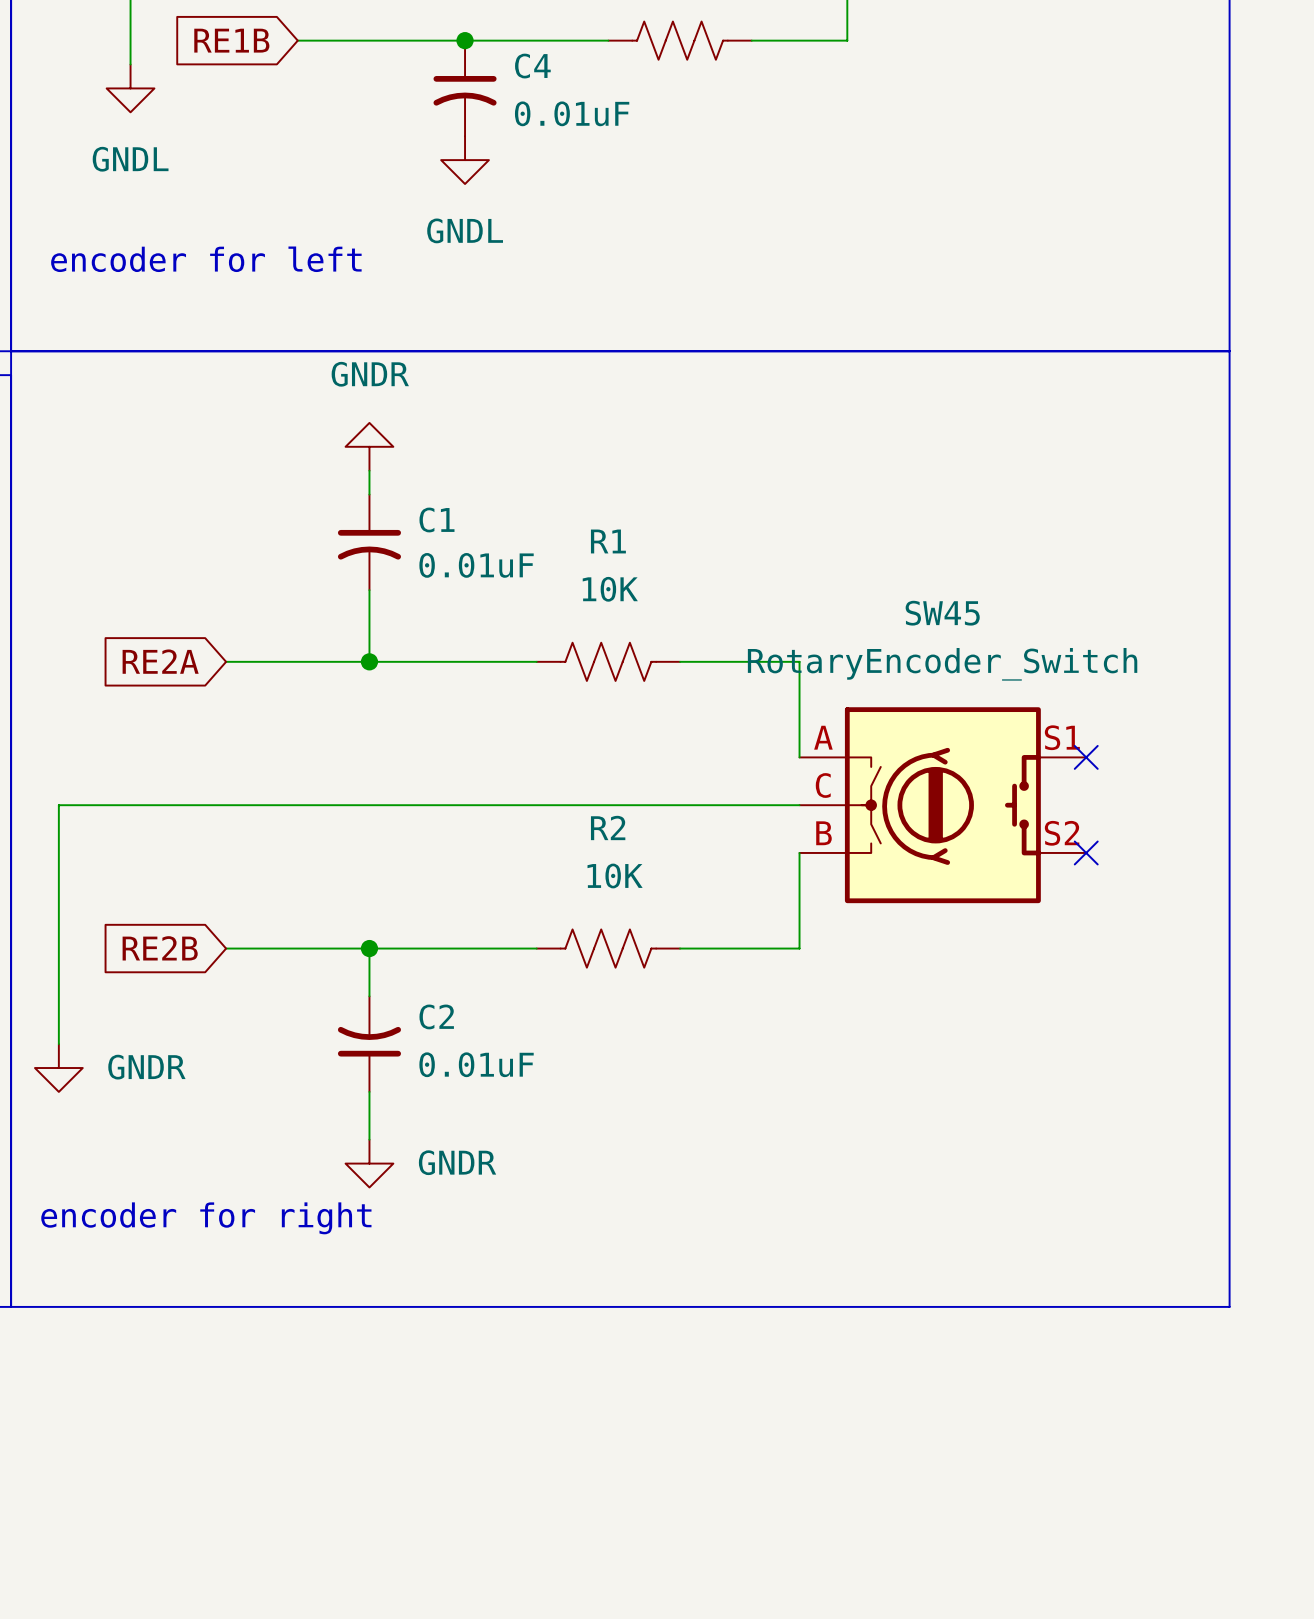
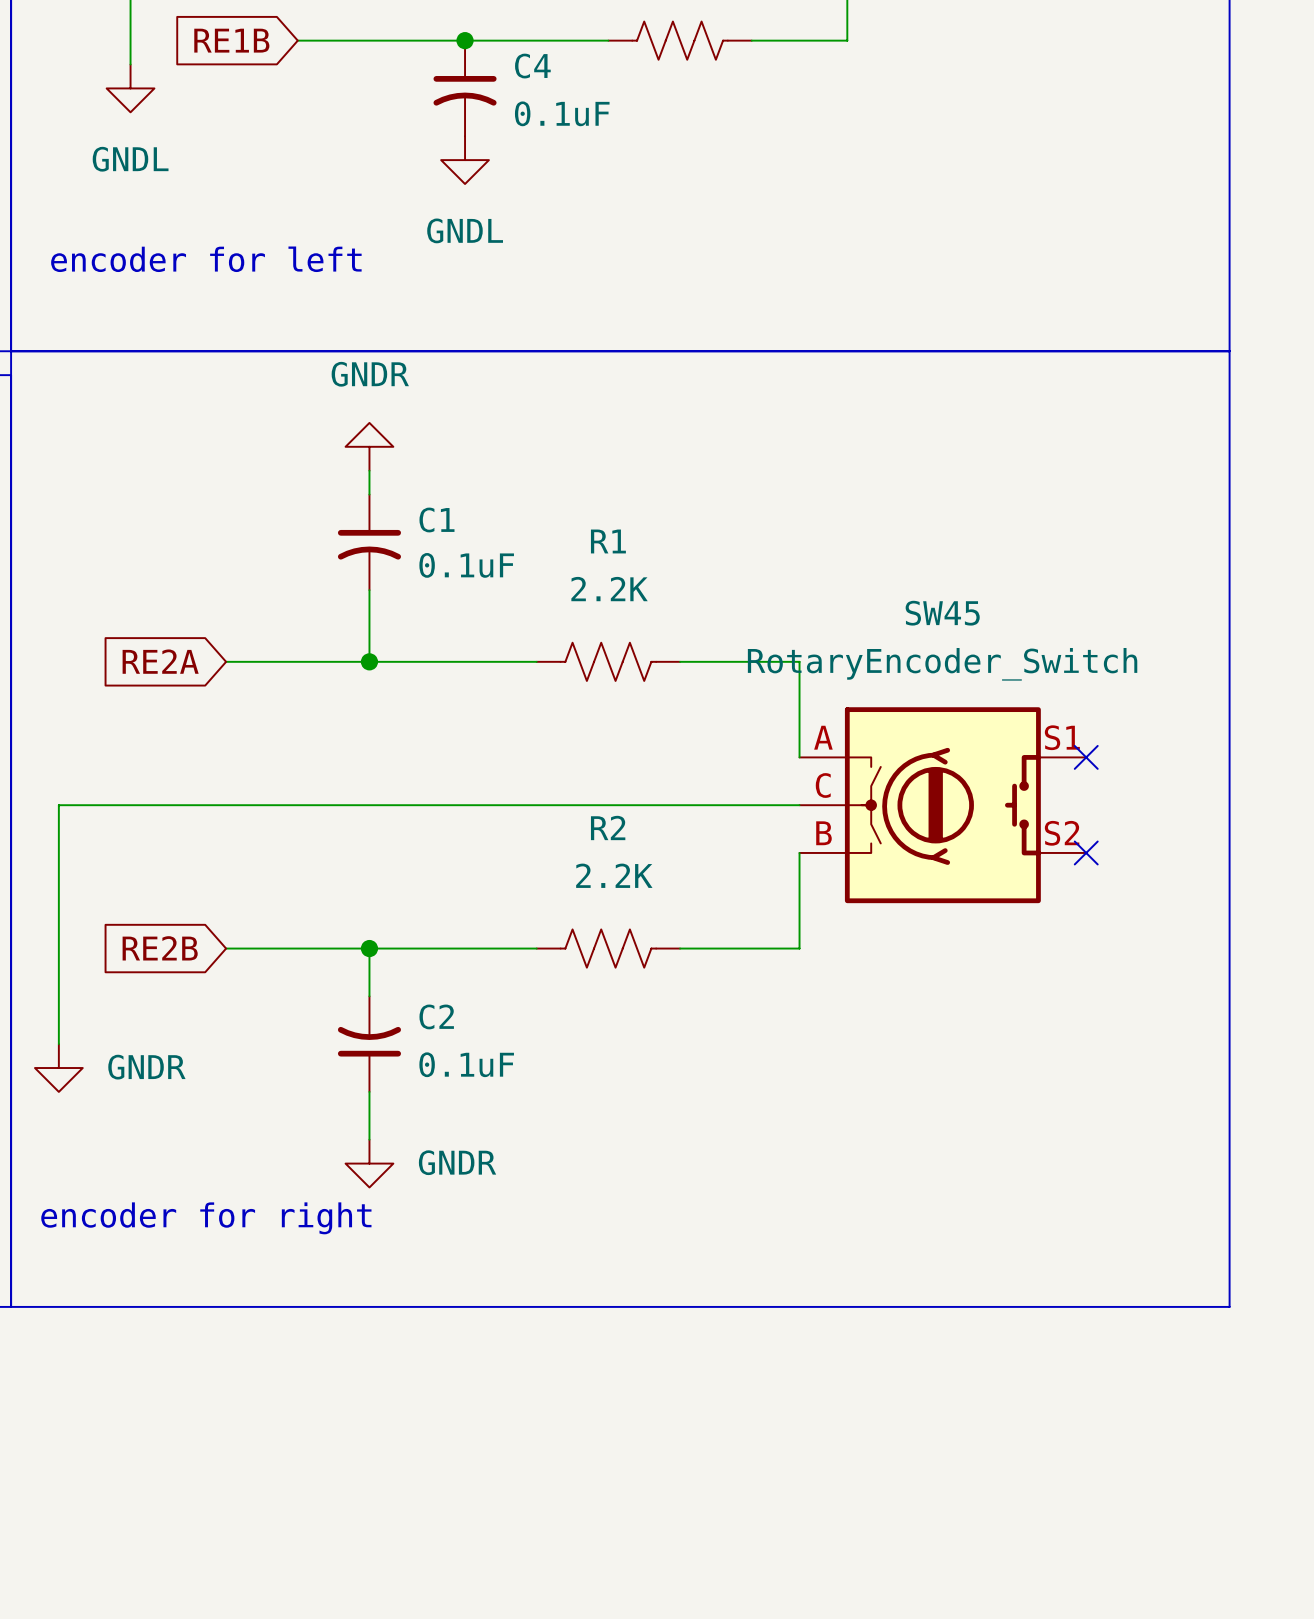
C4 value: 0.01uF (572, 113) -> 0.1uF (562, 113)
C1 value: 0.01uF (476, 565) -> 0.1uF (466, 565)
R1 value: 10K (610, 589) -> 2.2K (609, 589)
R2 value: 10K (615, 875) -> 2.2K (614, 875)
C2 value: 0.01uF (476, 1064) -> 0.1uF (466, 1064)

